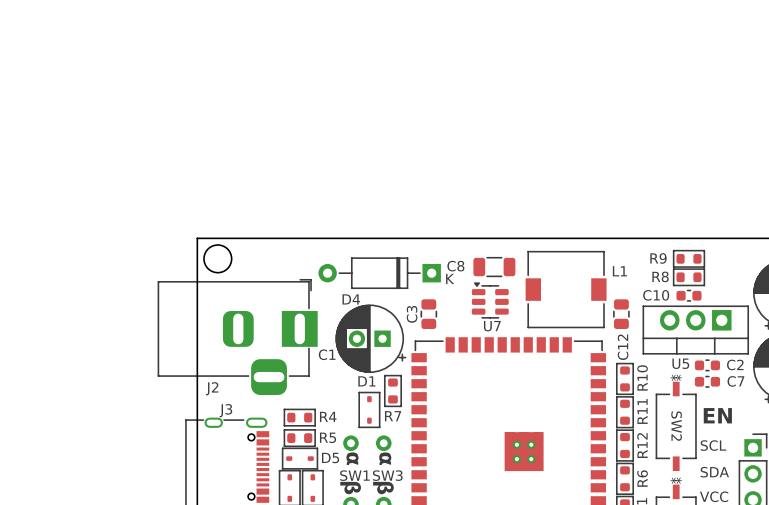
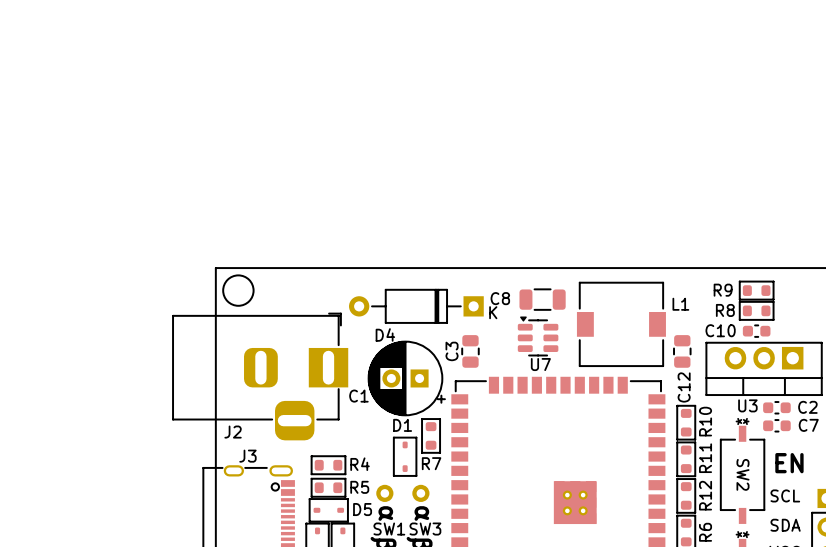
U5 name: U5 (680, 363) -> U3 (747, 405)

